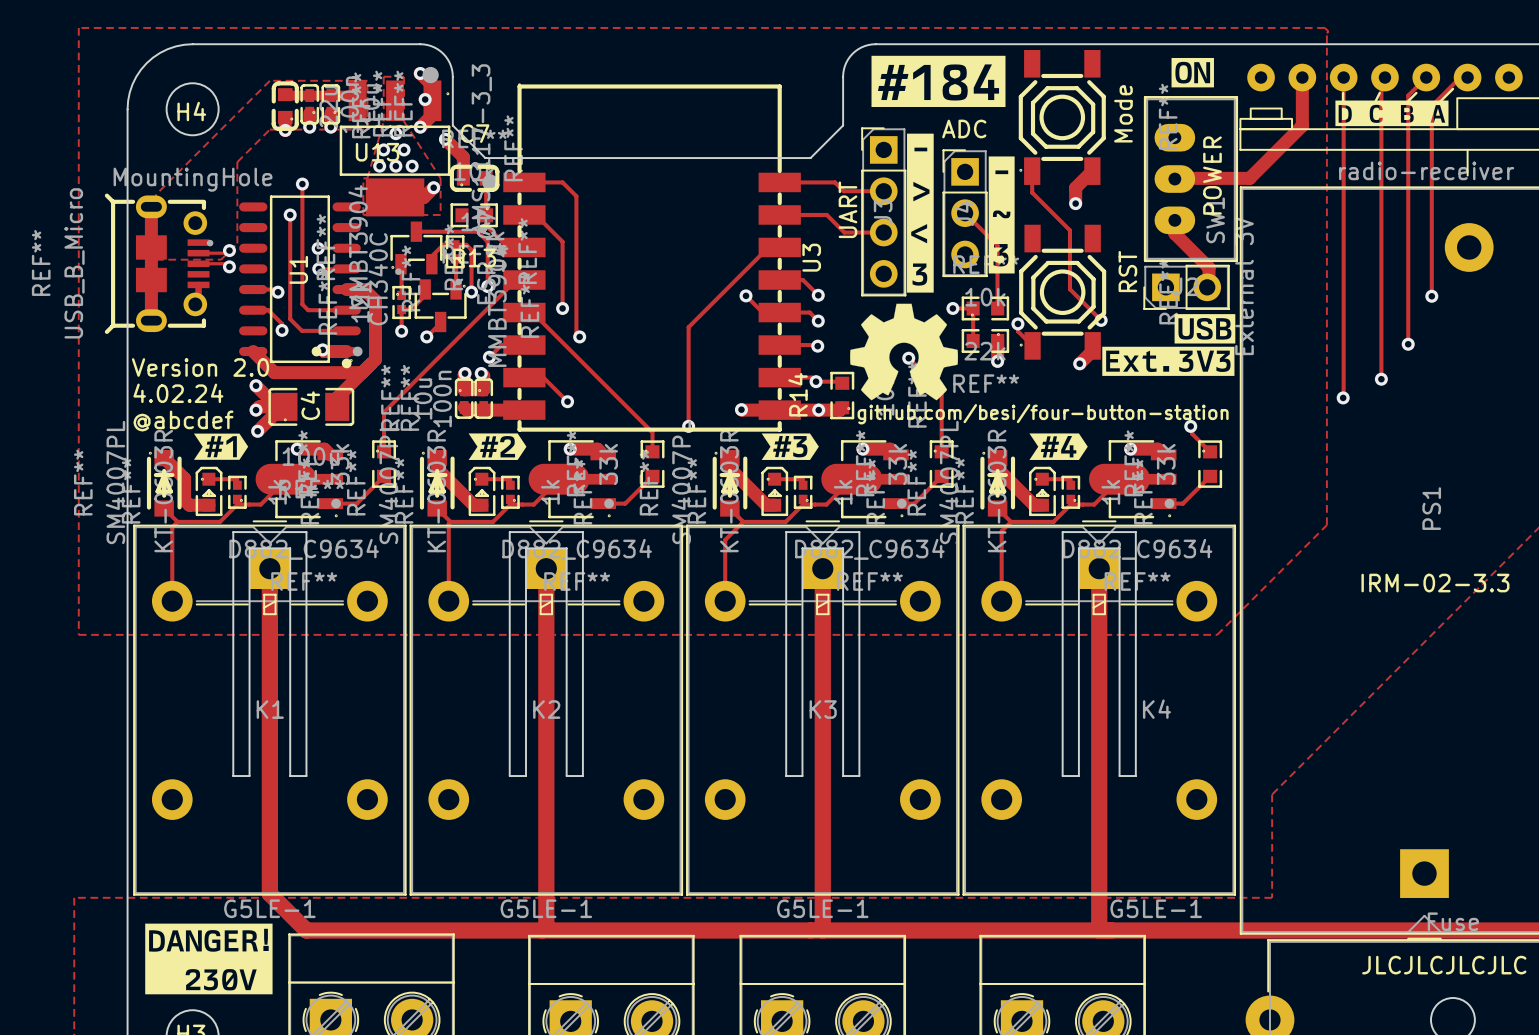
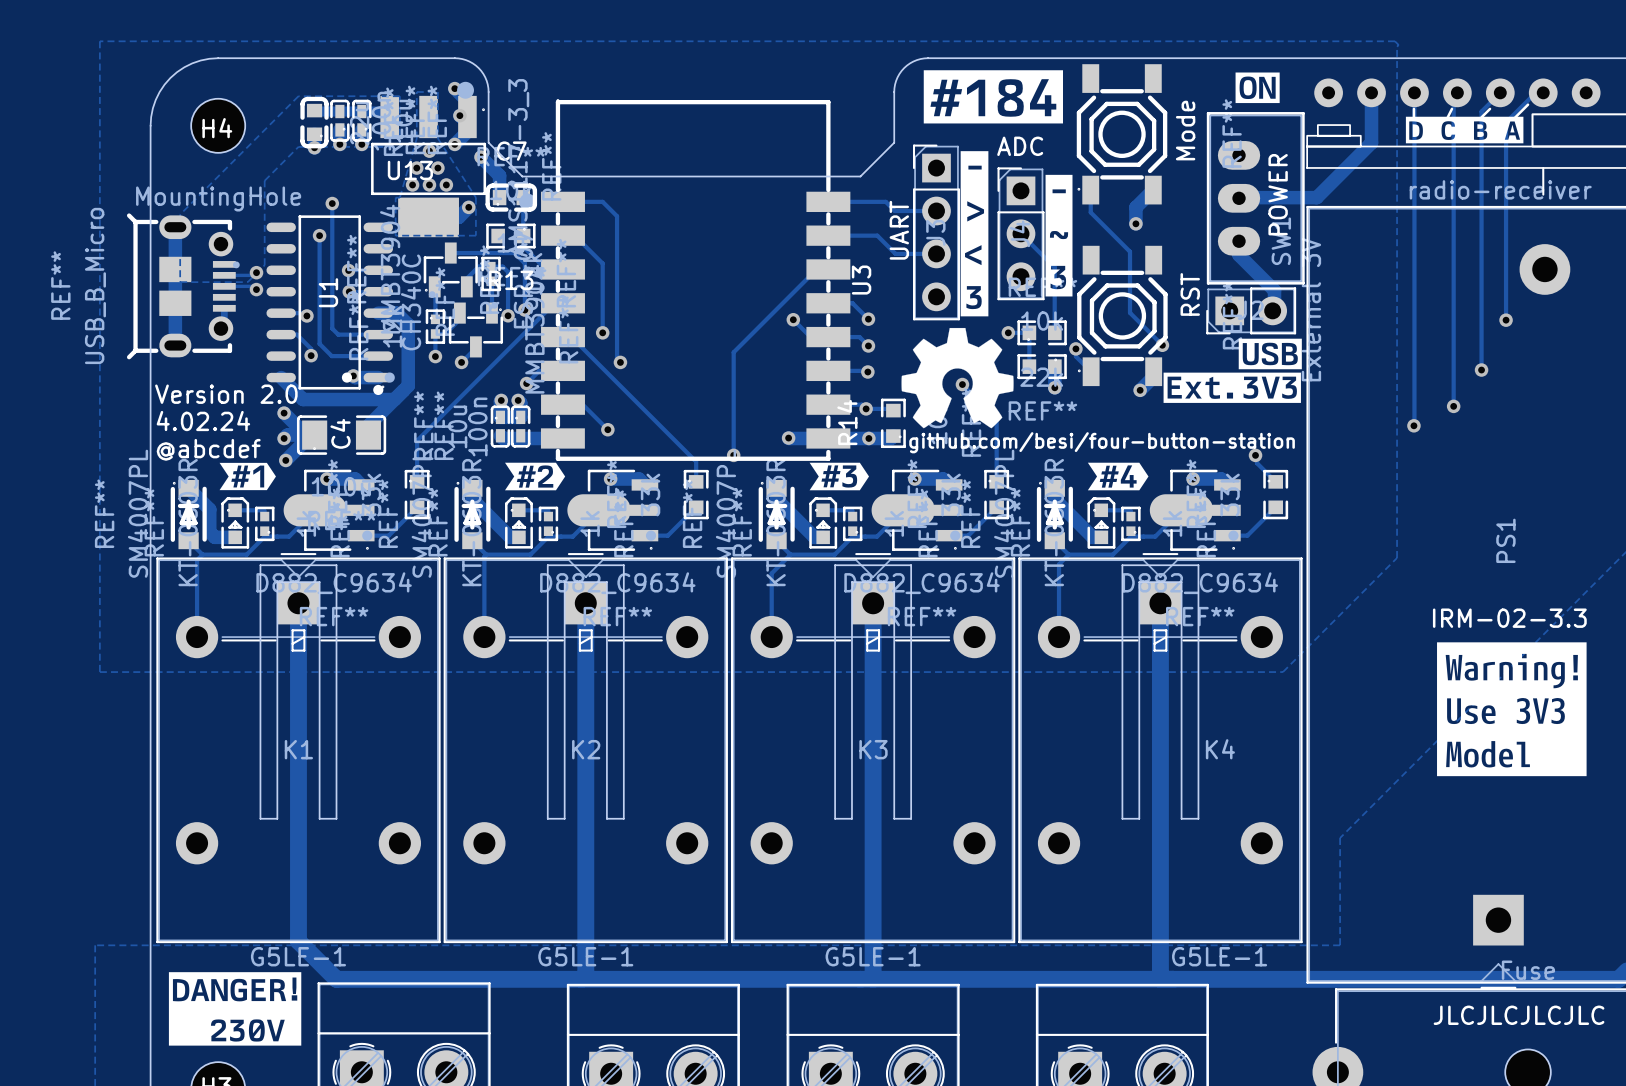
drawing: none -> [1437, 642, 1587, 777]

